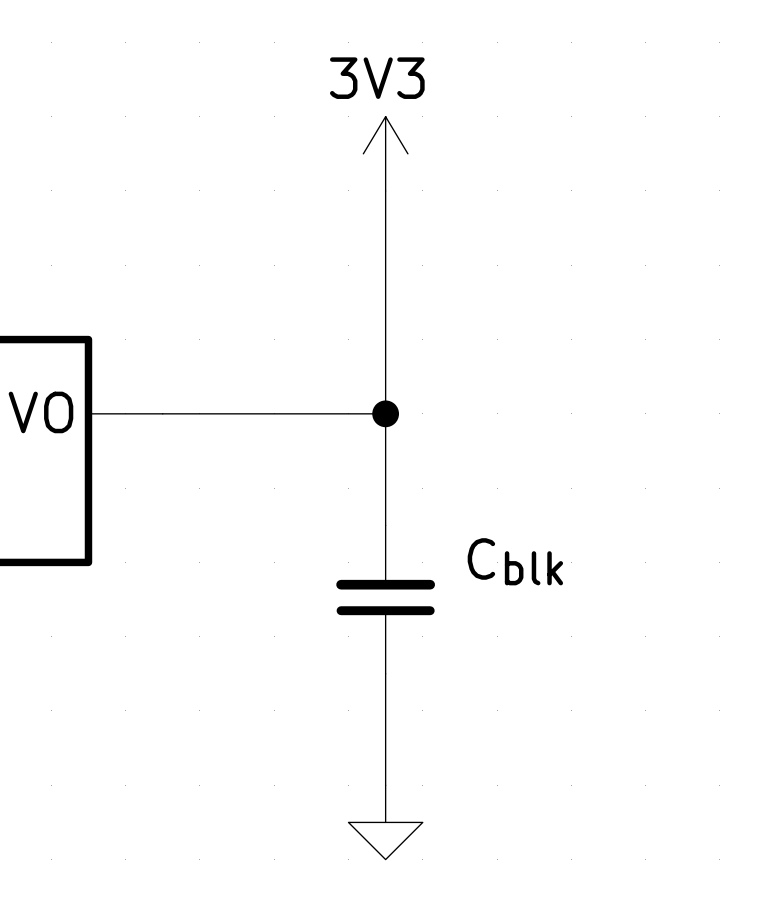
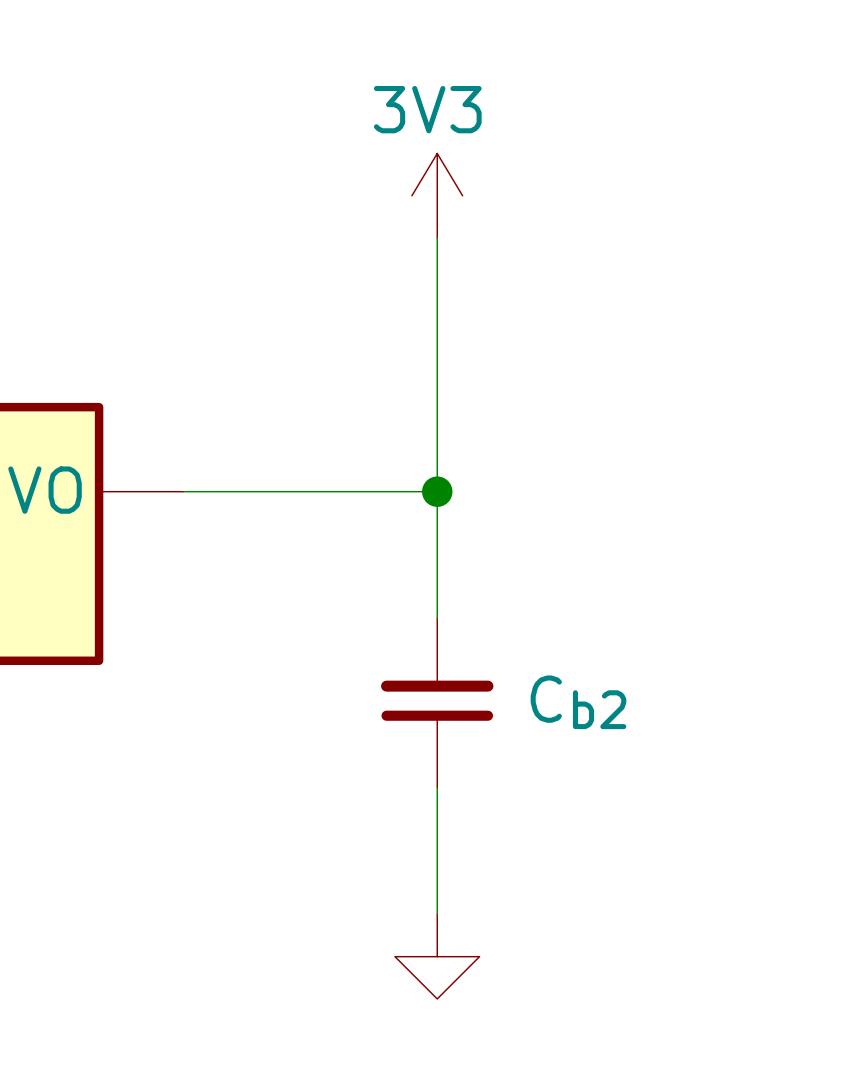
Cblk name: Cblk (515, 561) -> Cb2 (578, 702)

